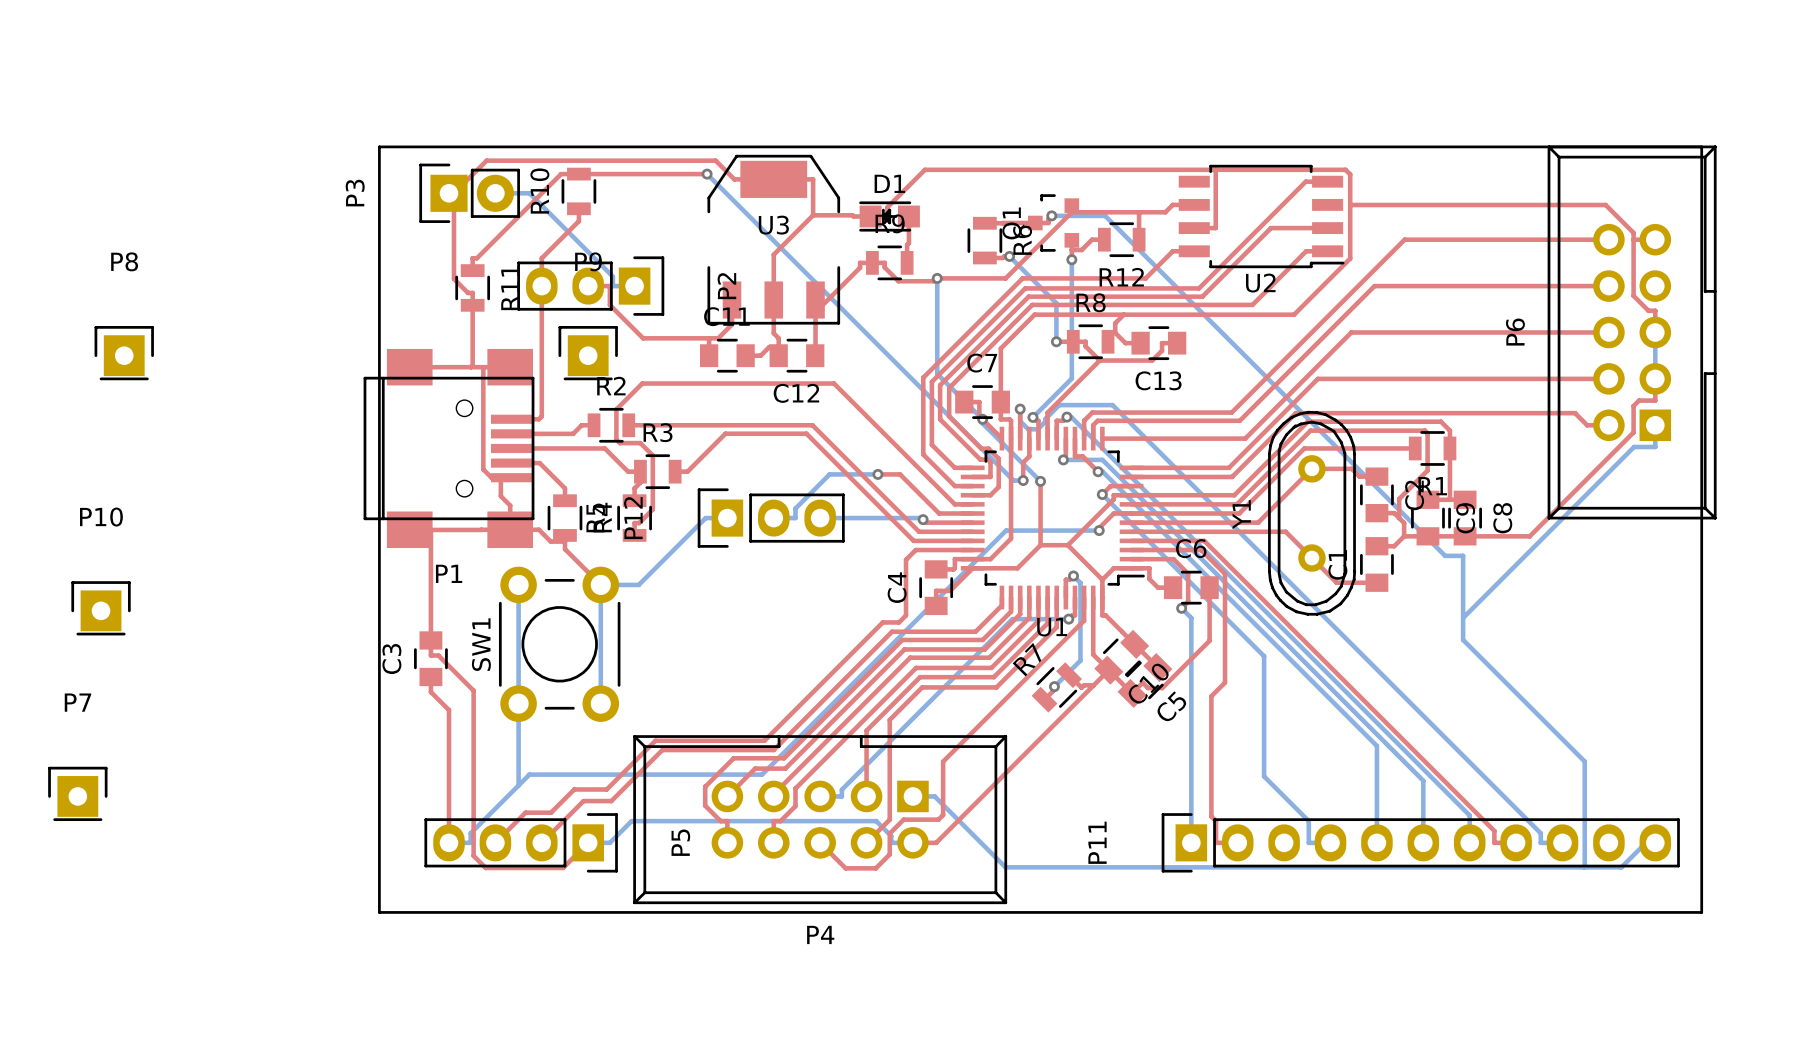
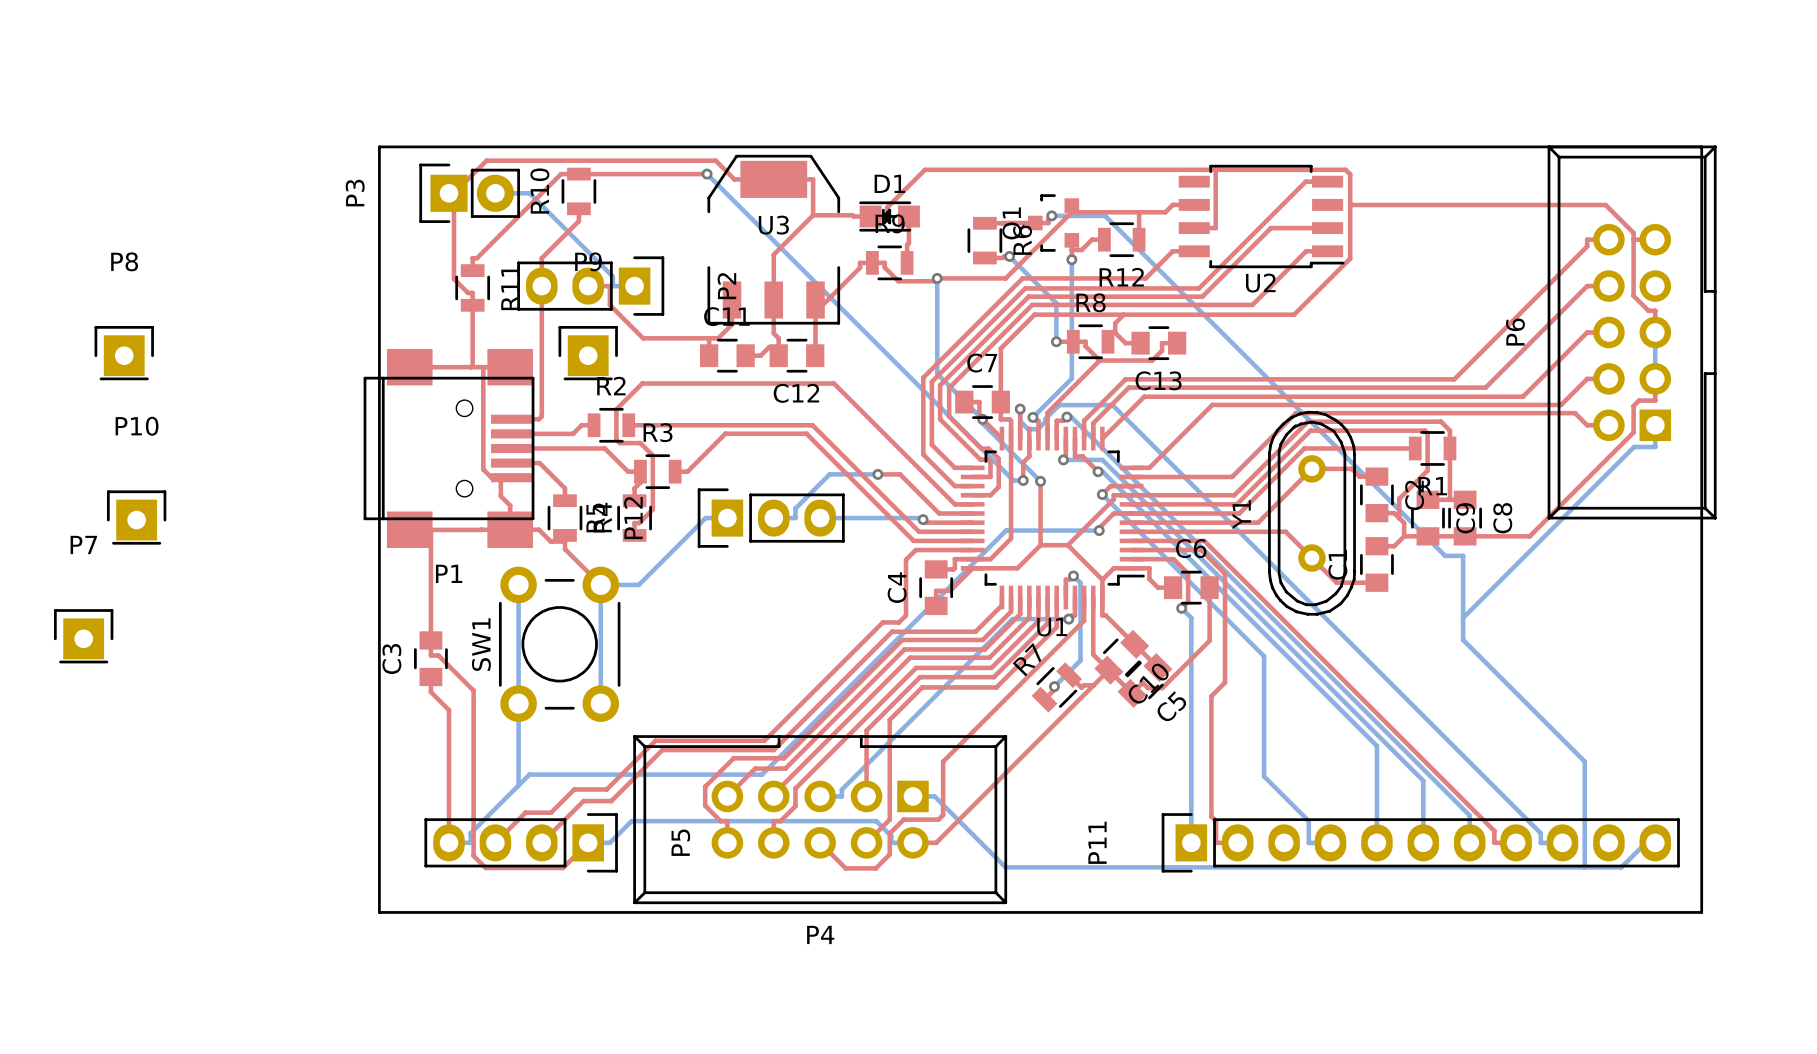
top track: (1587, 239) (1404, 239) (1231, 412) (1092, 412) -> (1587, 239) (1587, 246) (1454, 379) (1125, 379) (1092, 412)
top track: (1587, 286) (1374, 286) (1239, 420) (1097, 420) (1093, 425) -> (1587, 286) (1485, 387) (1128, 387) (1093, 425)
top track: (1587, 332) (1351, 332) (1245, 438) (1102, 438) -> (1587, 332) (1522, 396) (1144, 396) (1102, 438)
top track: (1587, 378) (1317, 378) (1228, 467) (1149, 467) -> (1587, 378) (1561, 404) (1212, 404) (1149, 467)
P10 position: (101, 608) -> (136, 517)
P7 position: (77, 793) -> (83, 636)

